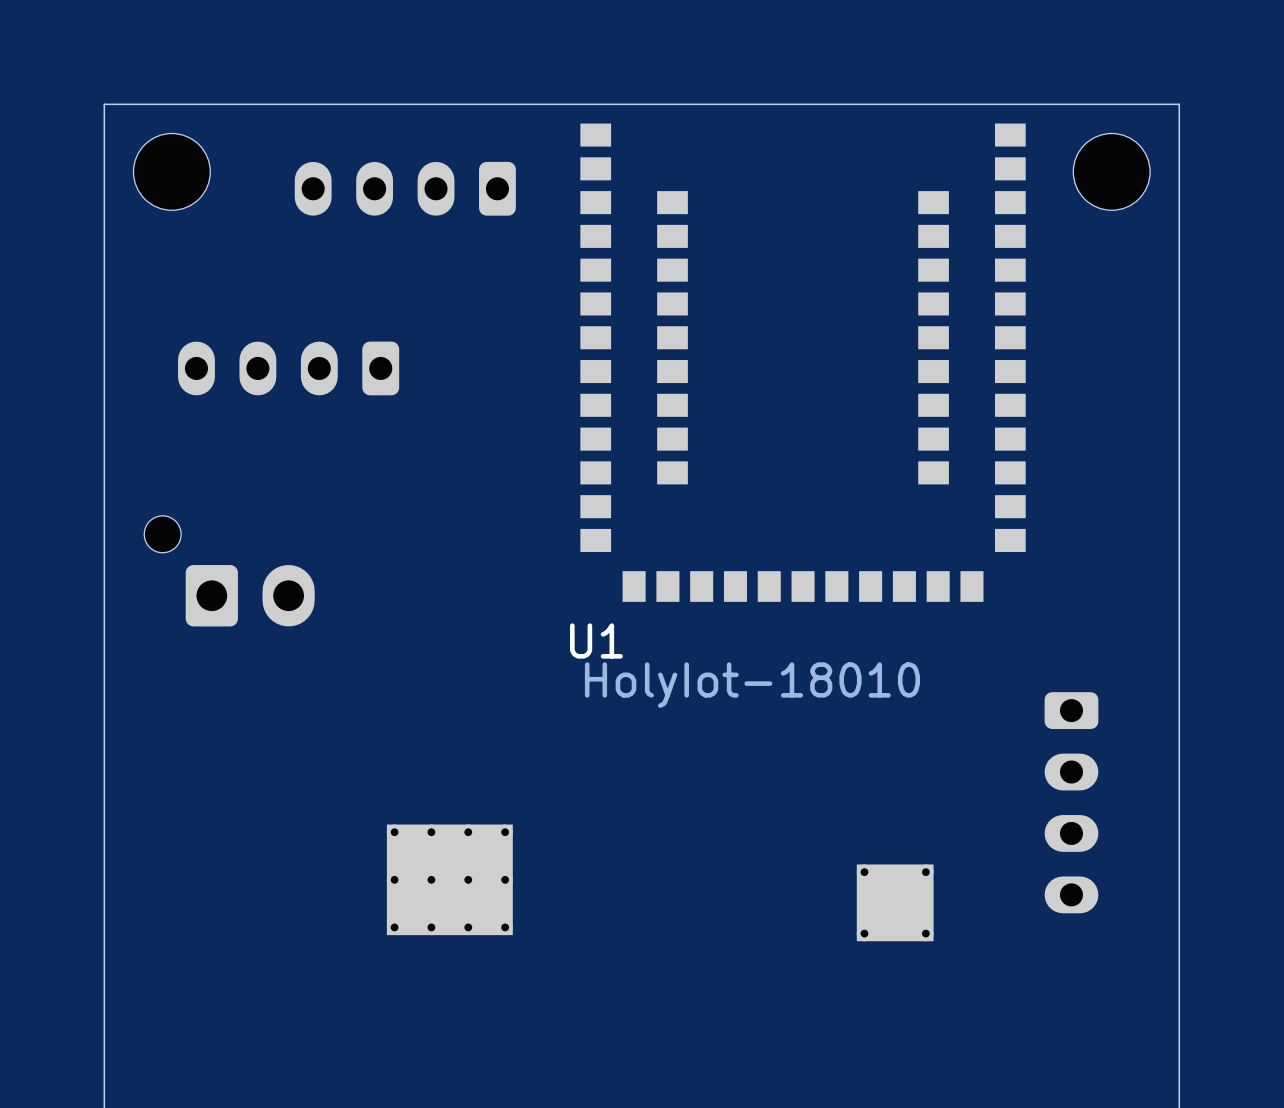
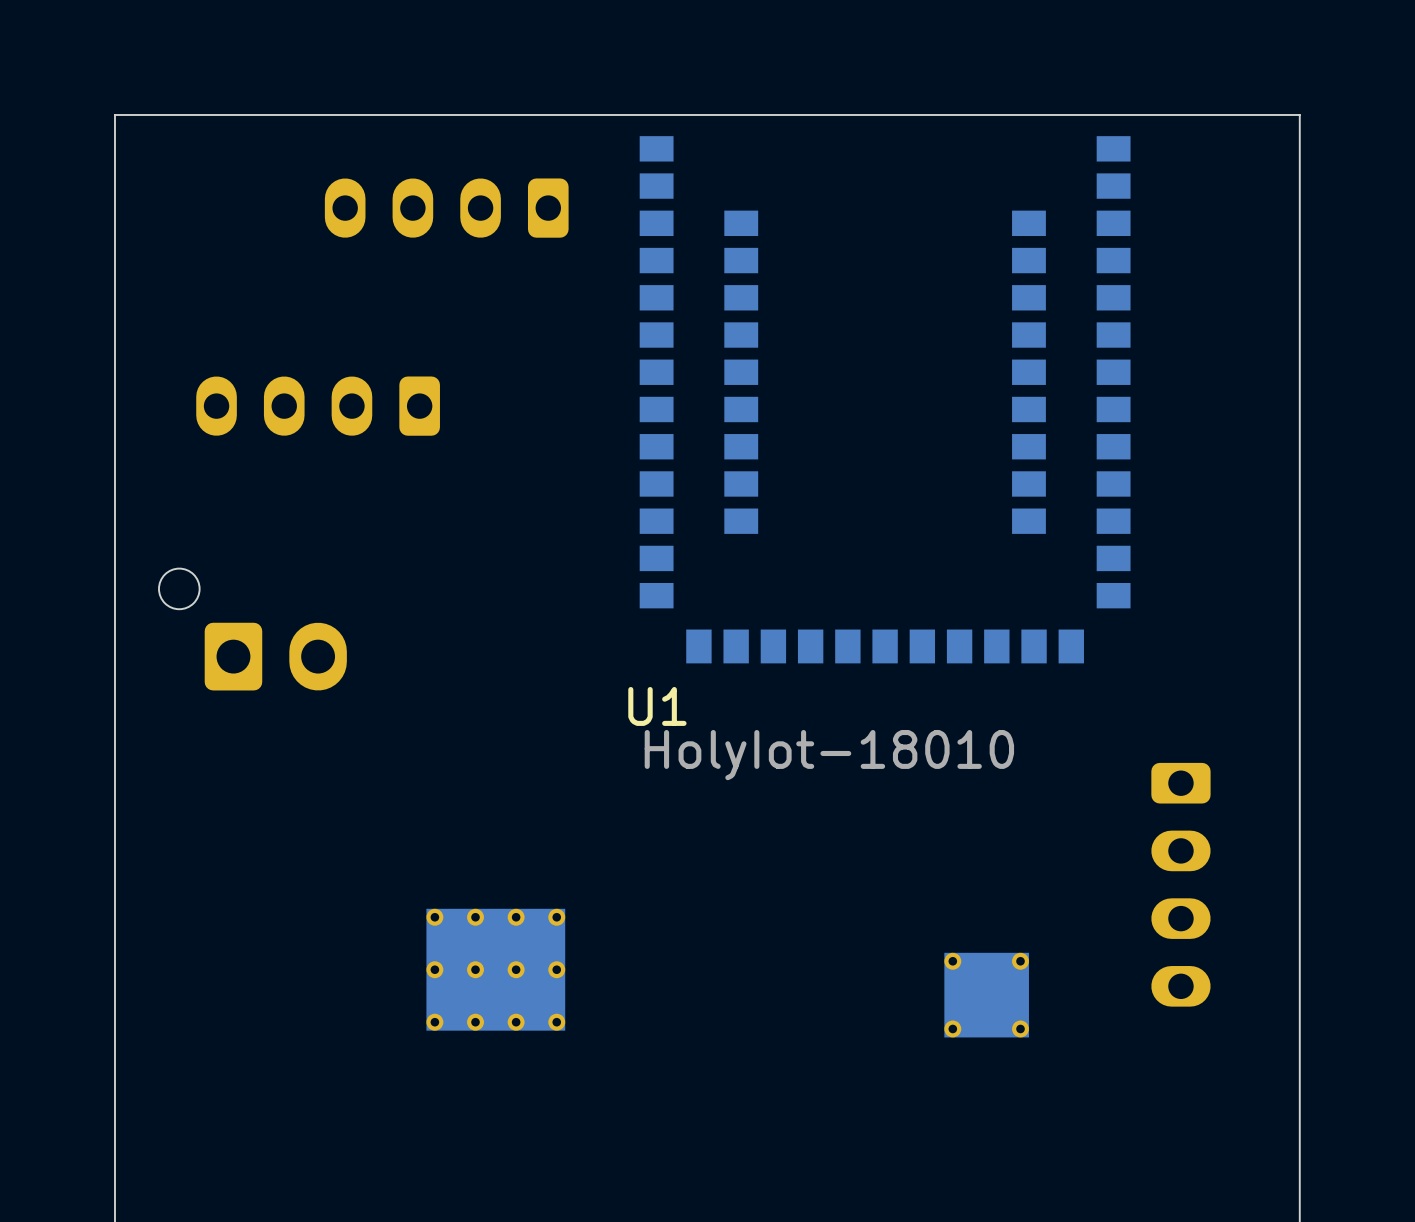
part: (171, 171) -> none
part: (1111, 171) -> none

